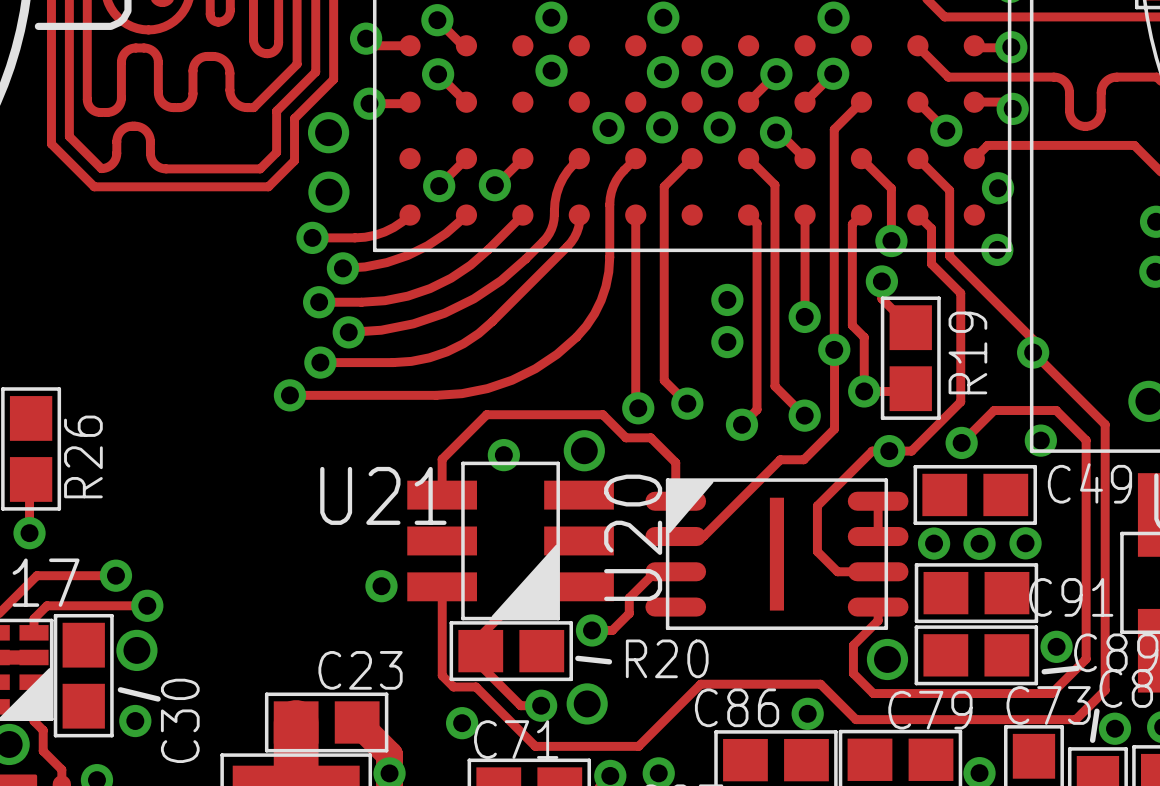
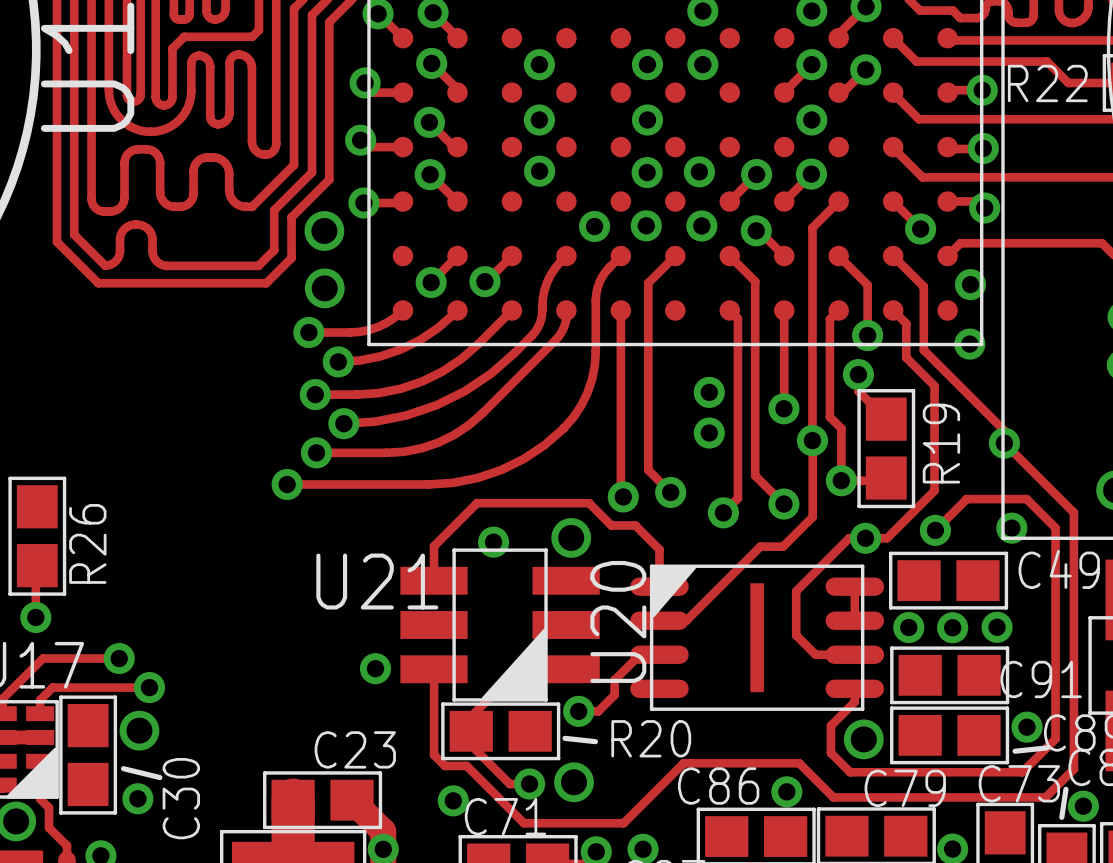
track: (1053, 77) (1061, 79) (1067, 84) (1070, 116) (1077, 124) (1085, 126) -> (1024, 177) (1085, 177)
track: (1116, 77) (1109, 79) (1103, 84) (1100, 116) (1095, 123) (1085, 126) -> none

